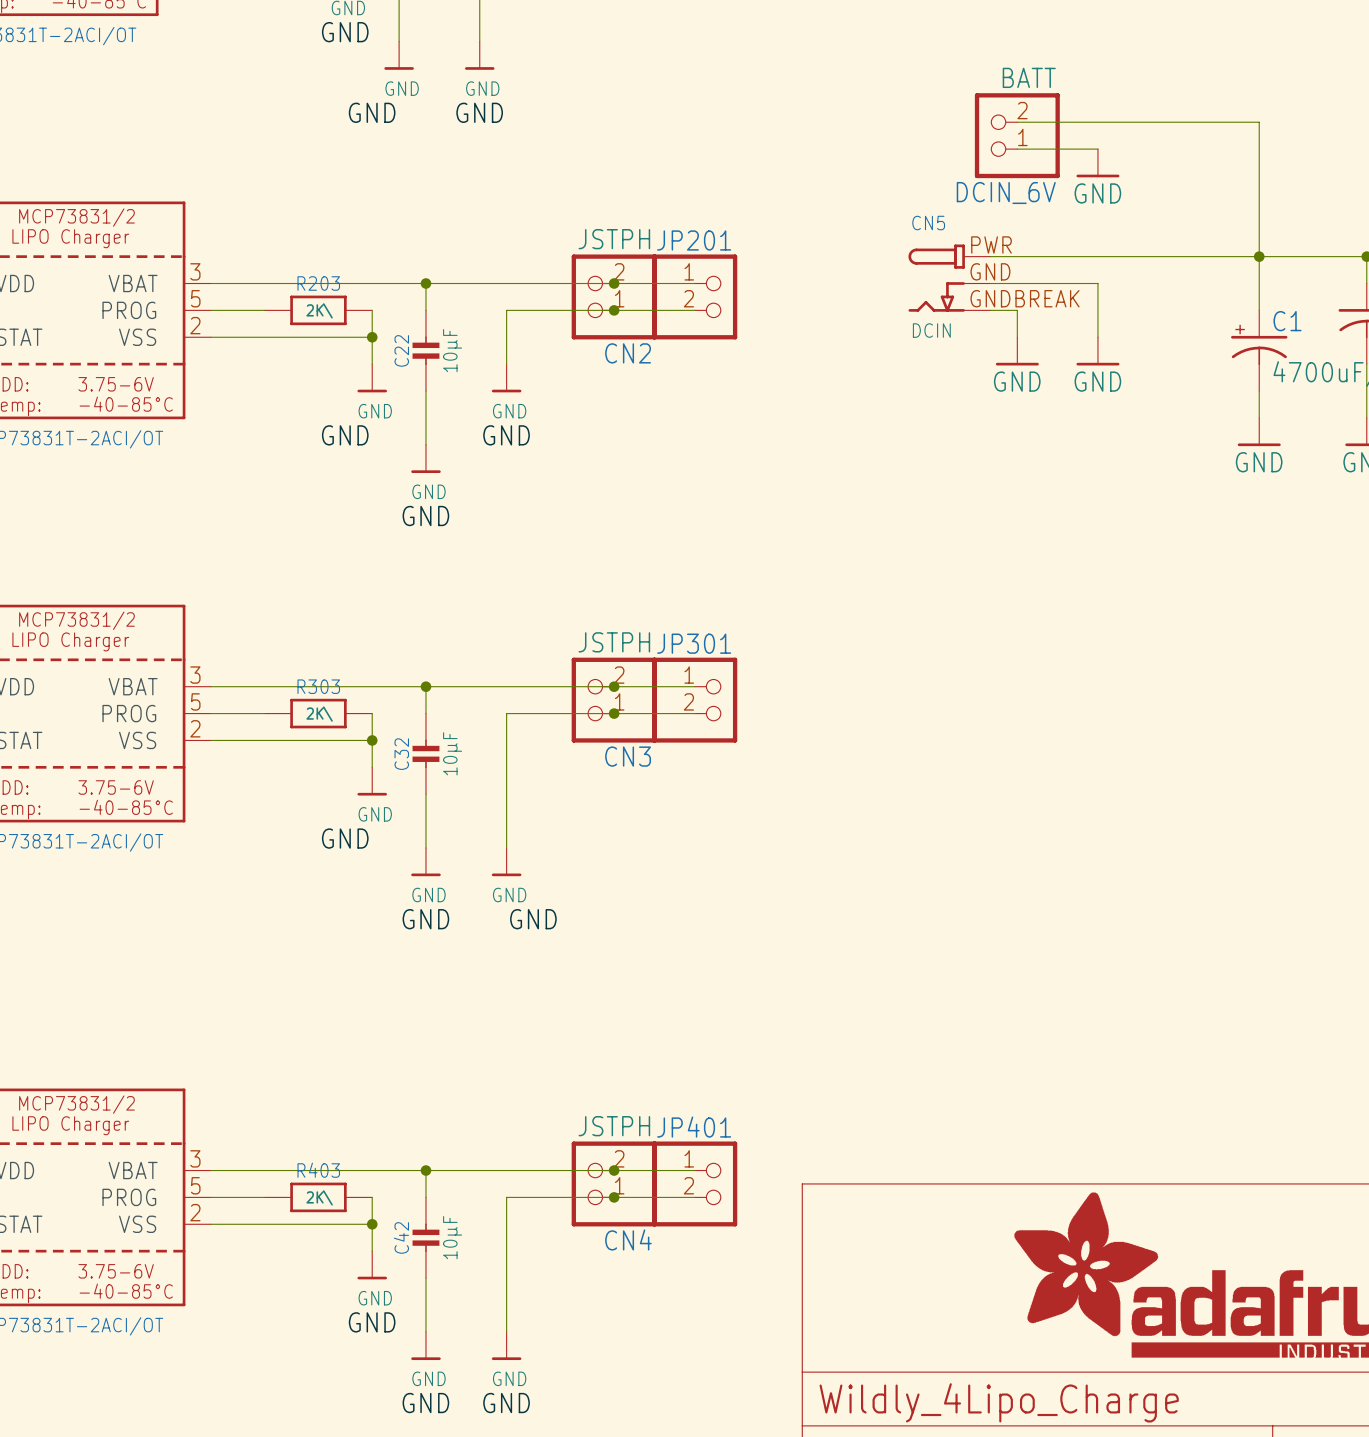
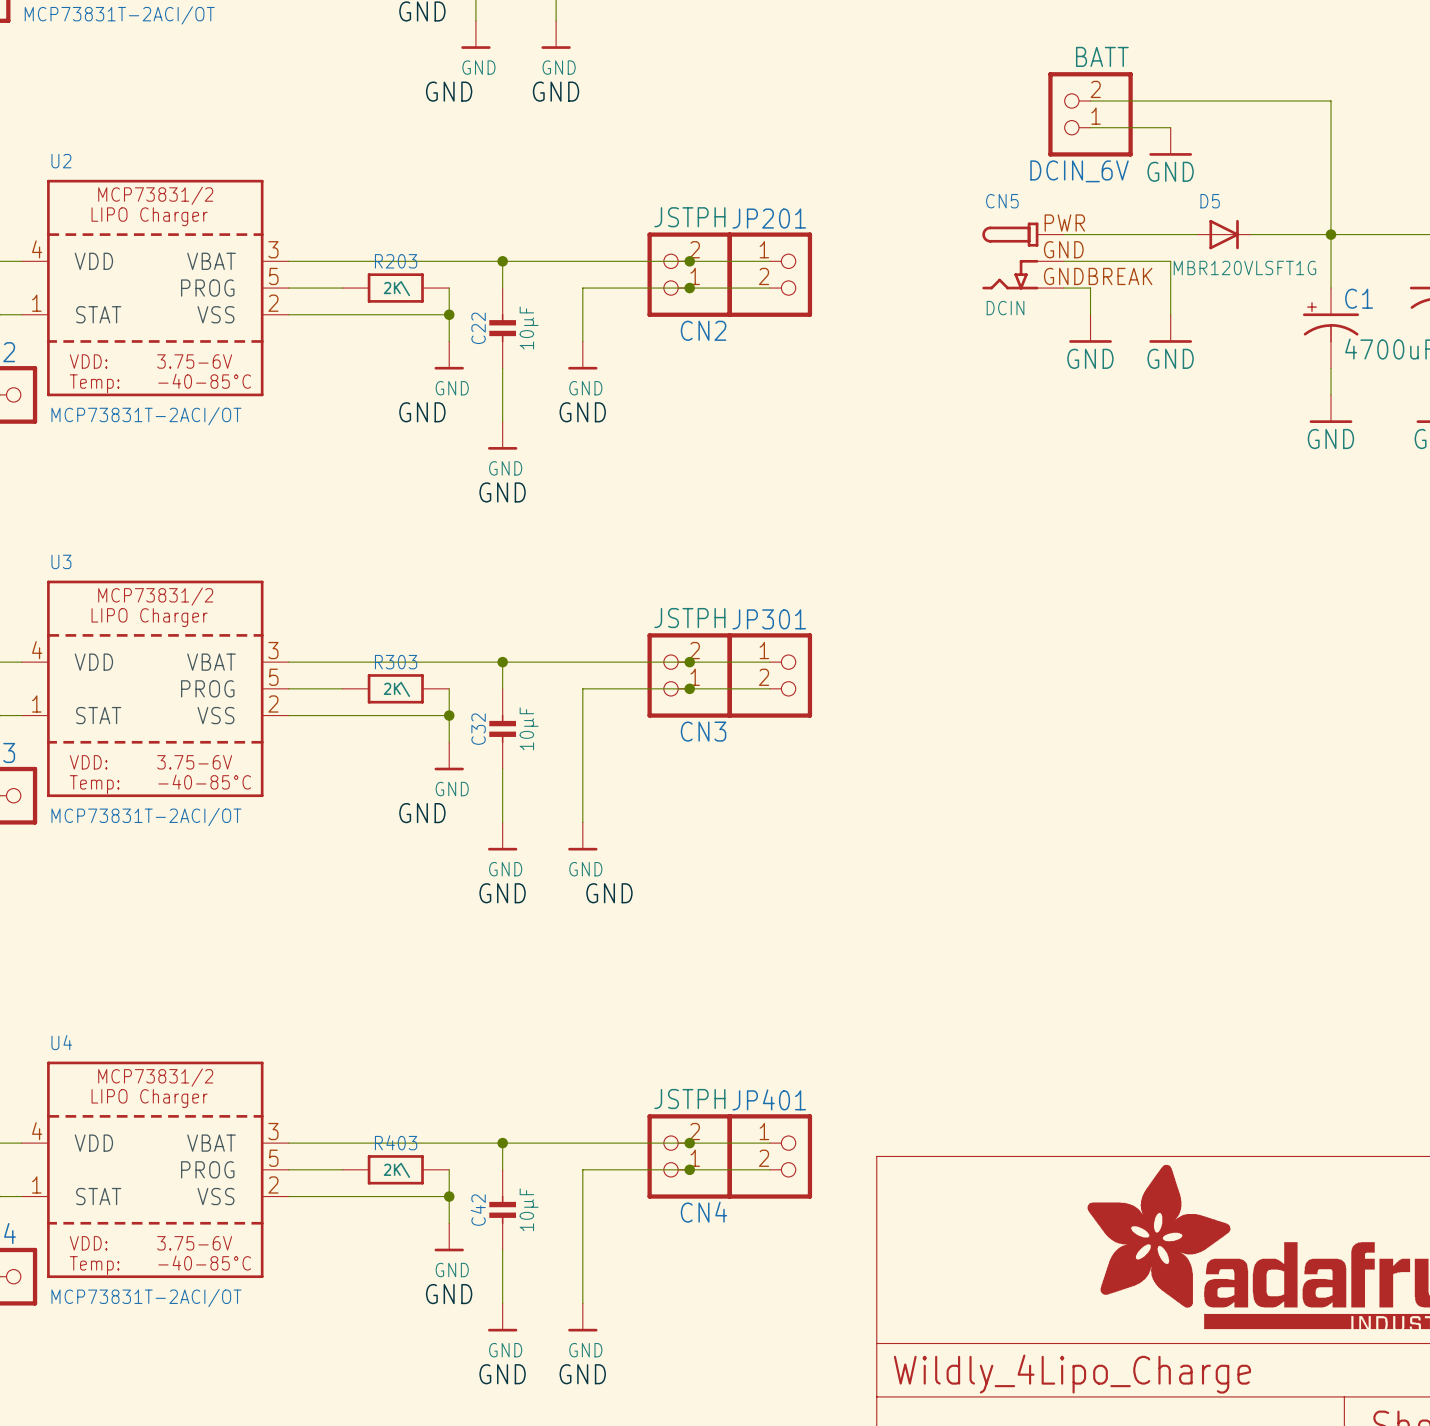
D5: none -> MBR120VLSFT1G (1224, 234)

